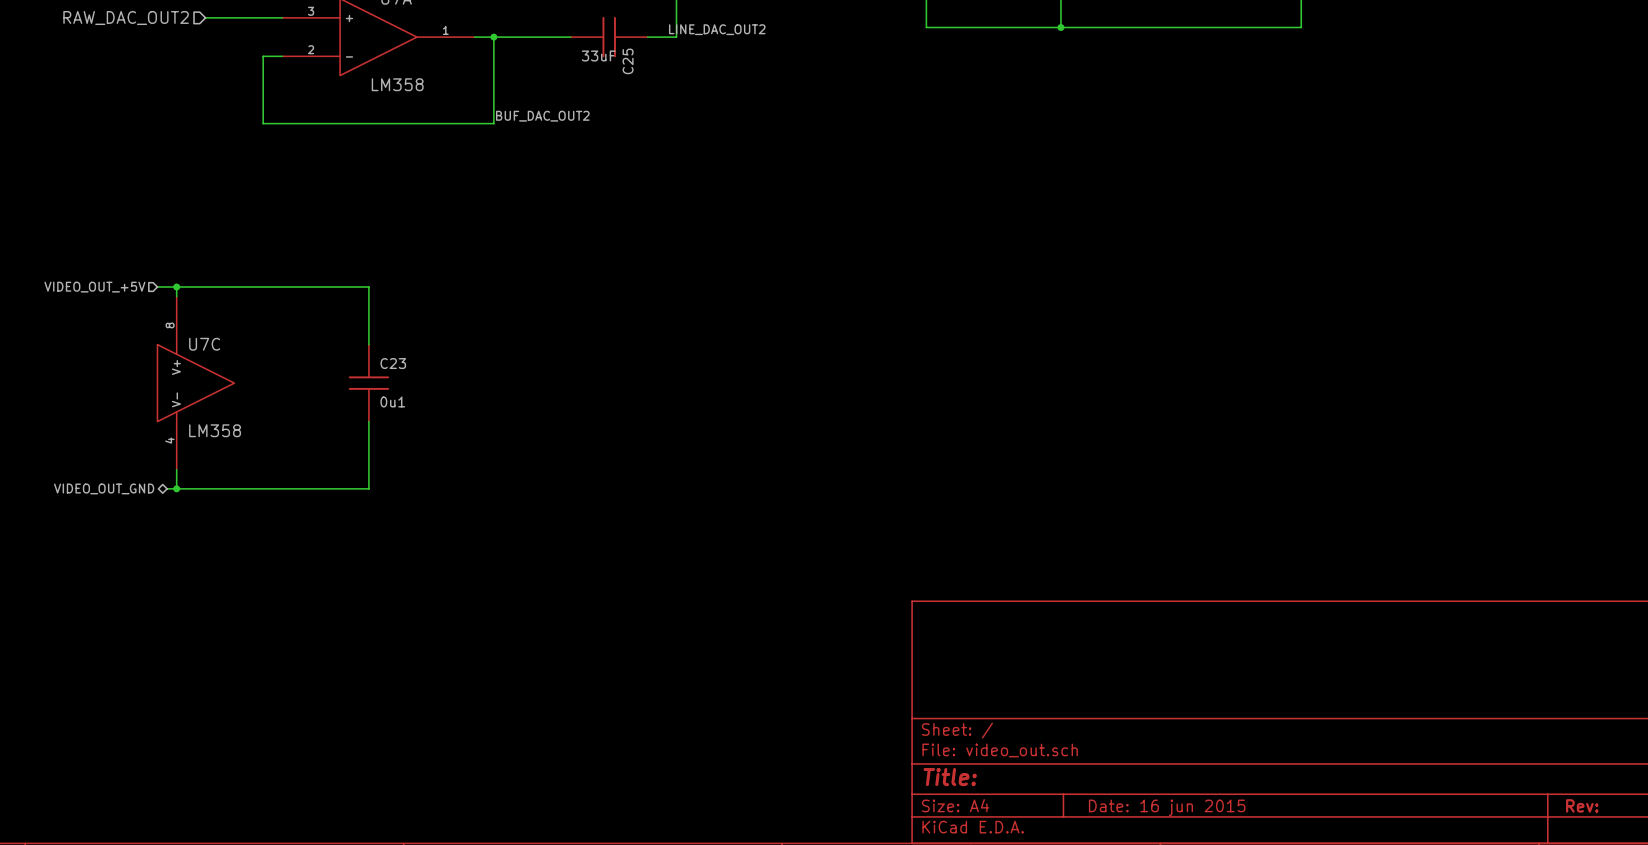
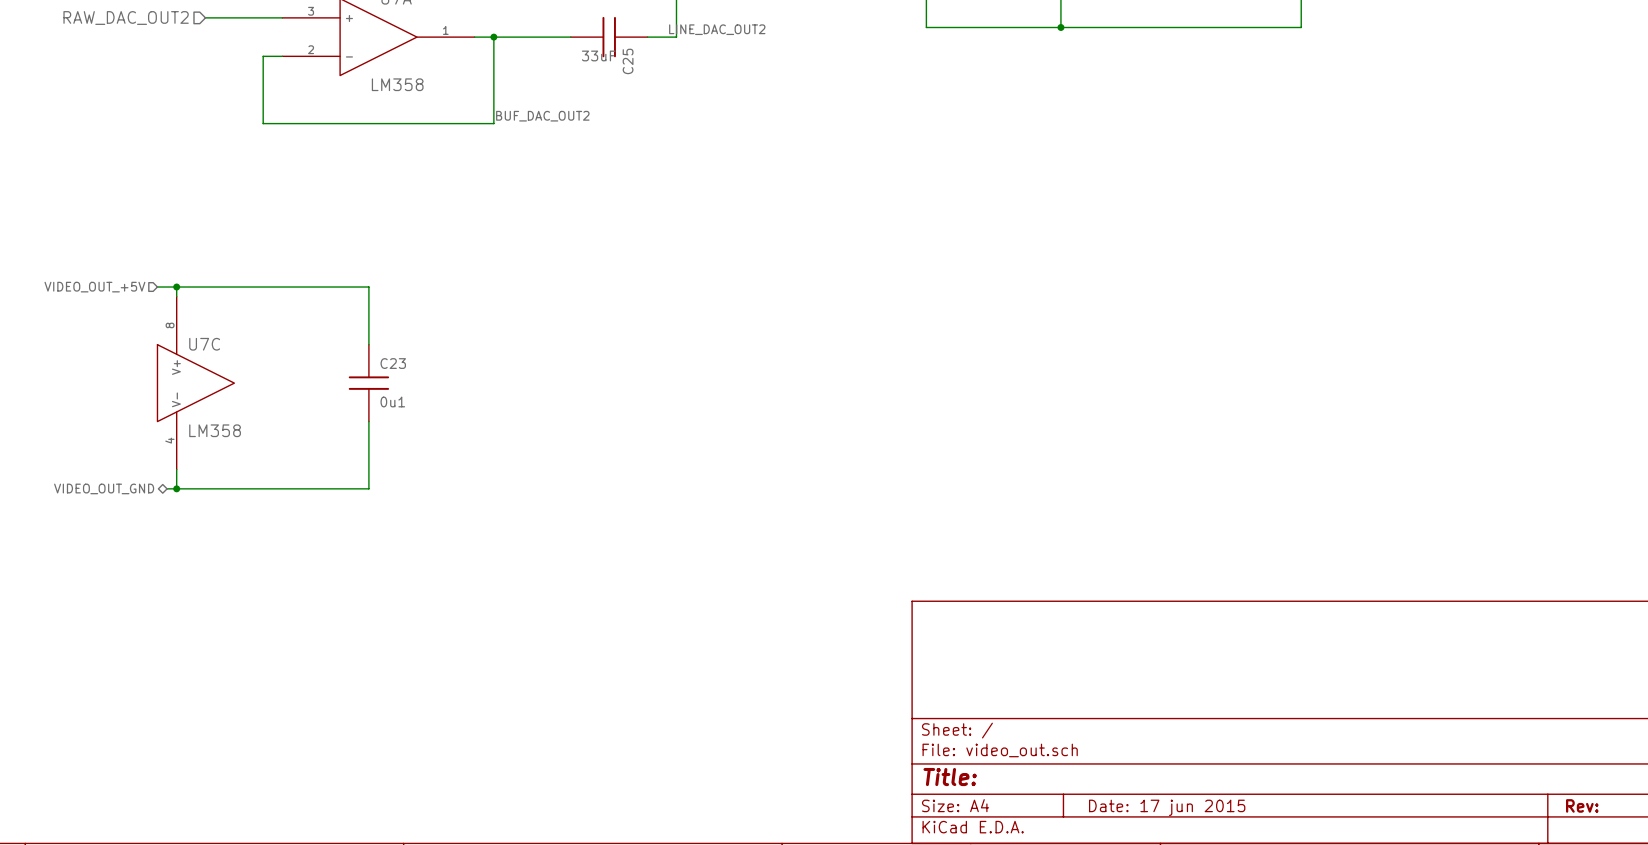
title block: Date: 16 jun 2015 (1167, 807) -> Date: 17 jun 2015 (1167, 807)

